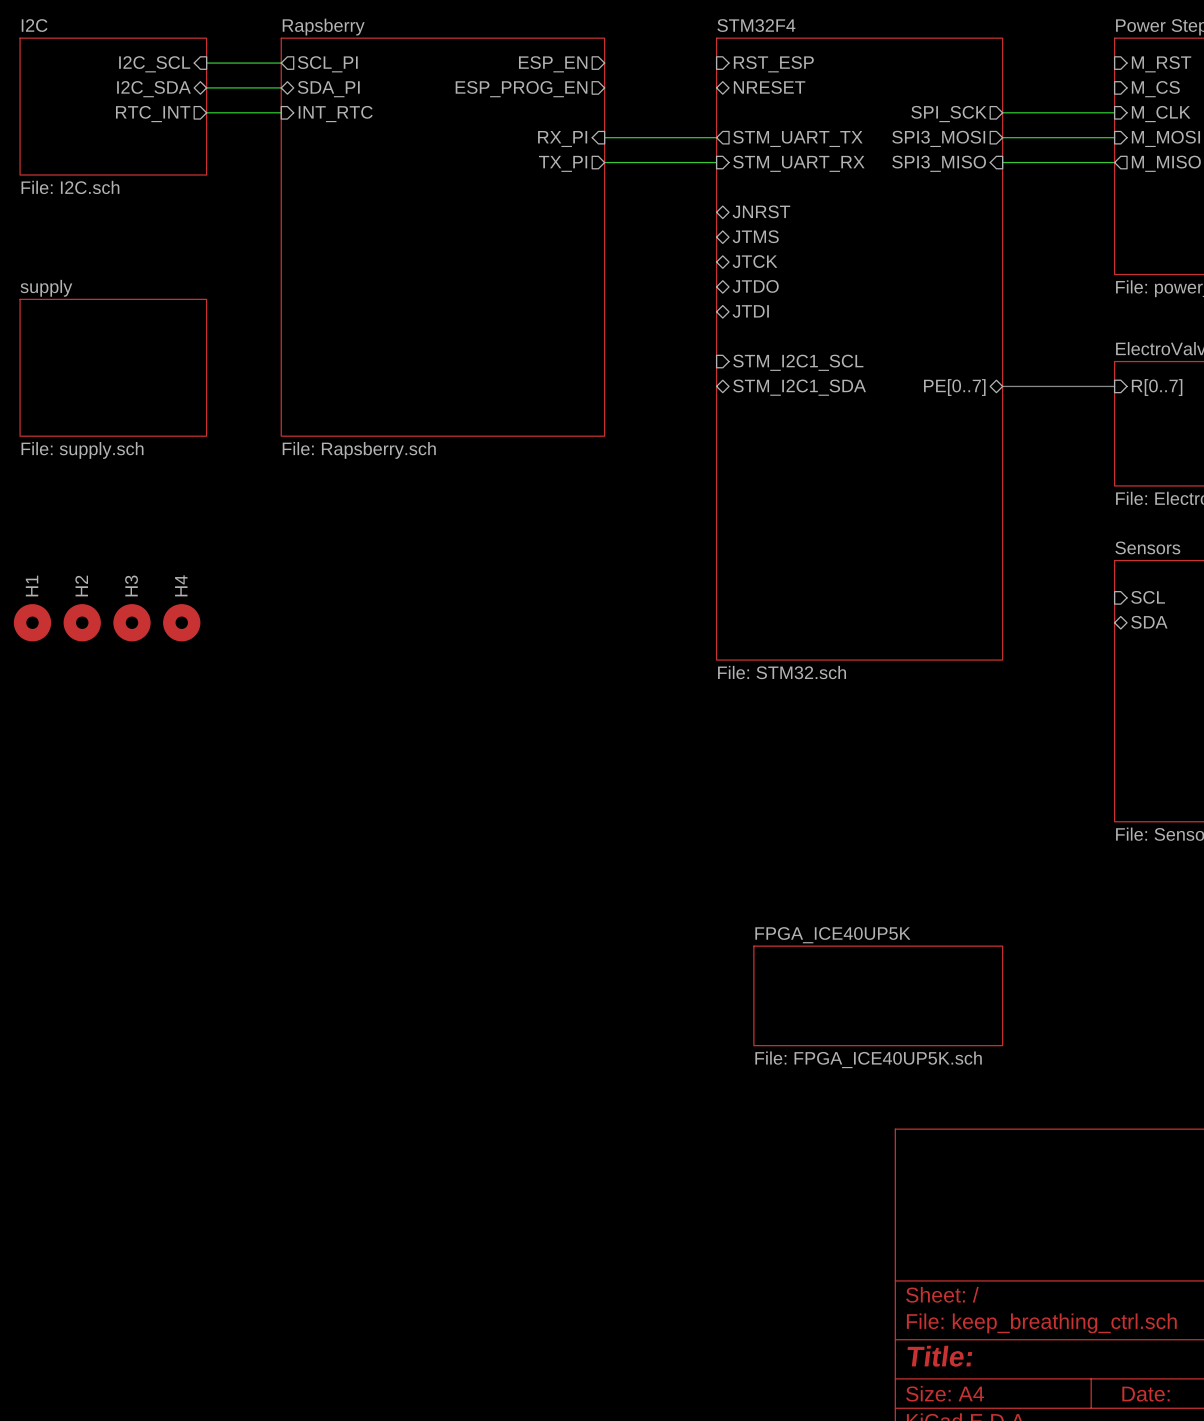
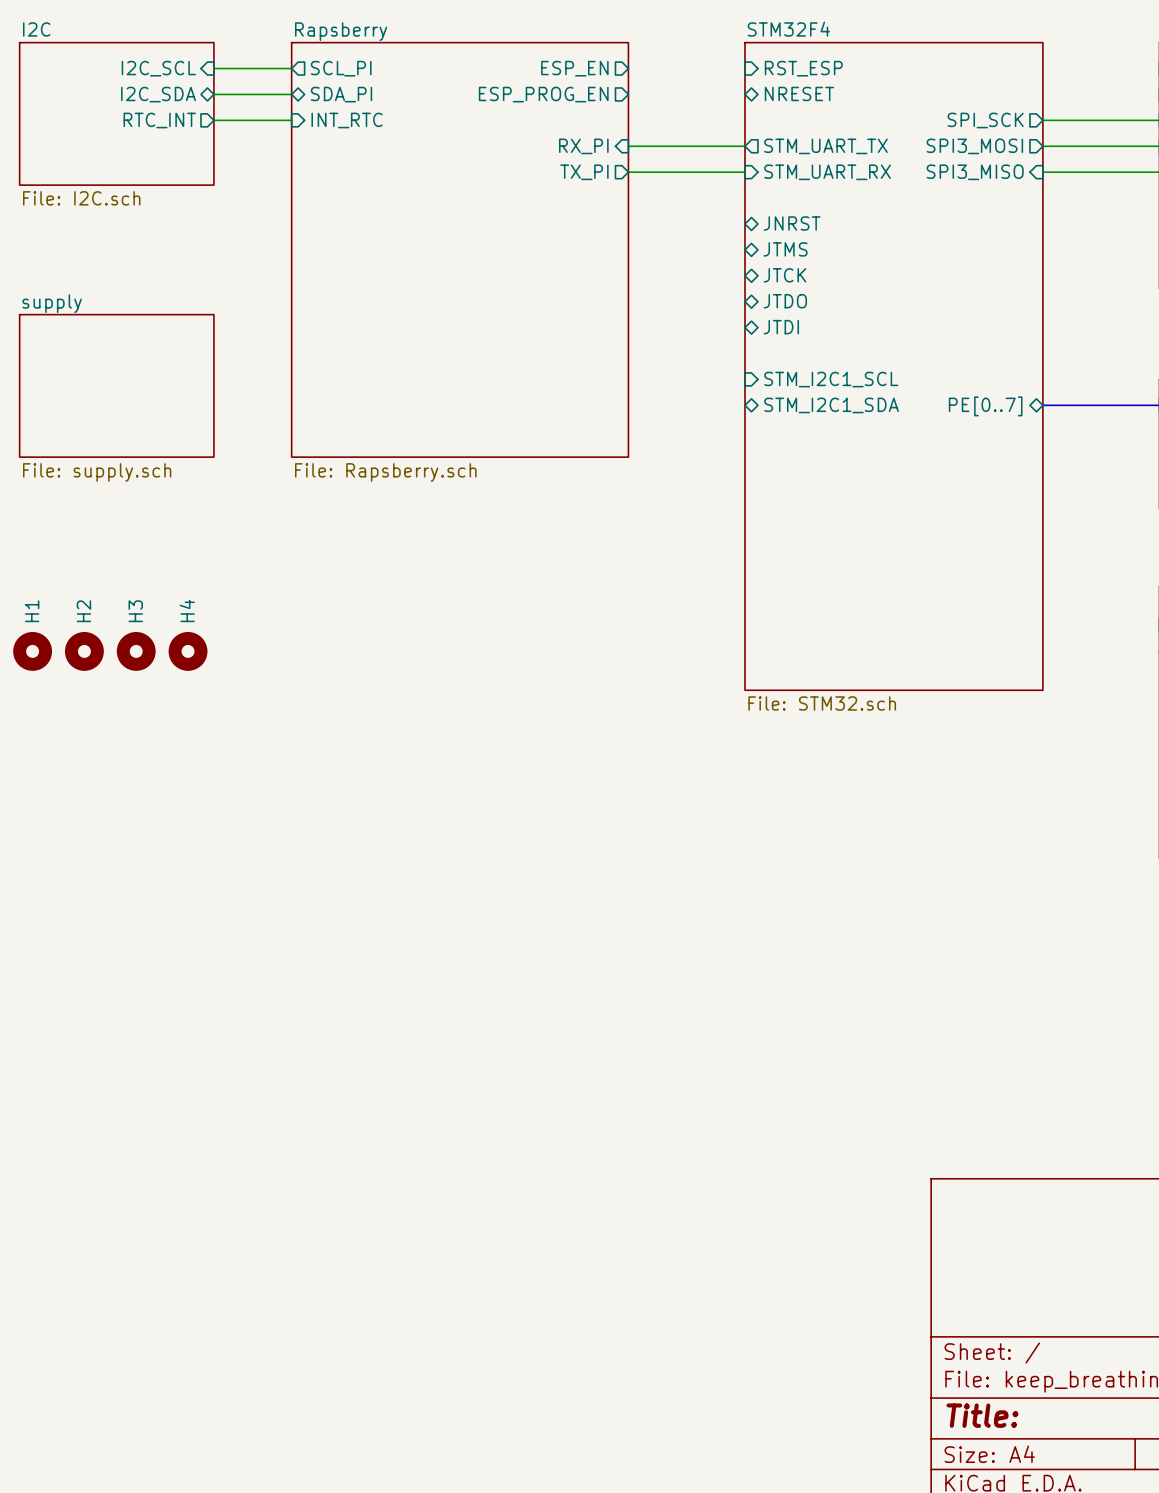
sheet FPGA_ICE40UP5K: File: FPGA_ICE40UP5K.sch (878, 995) -> none

